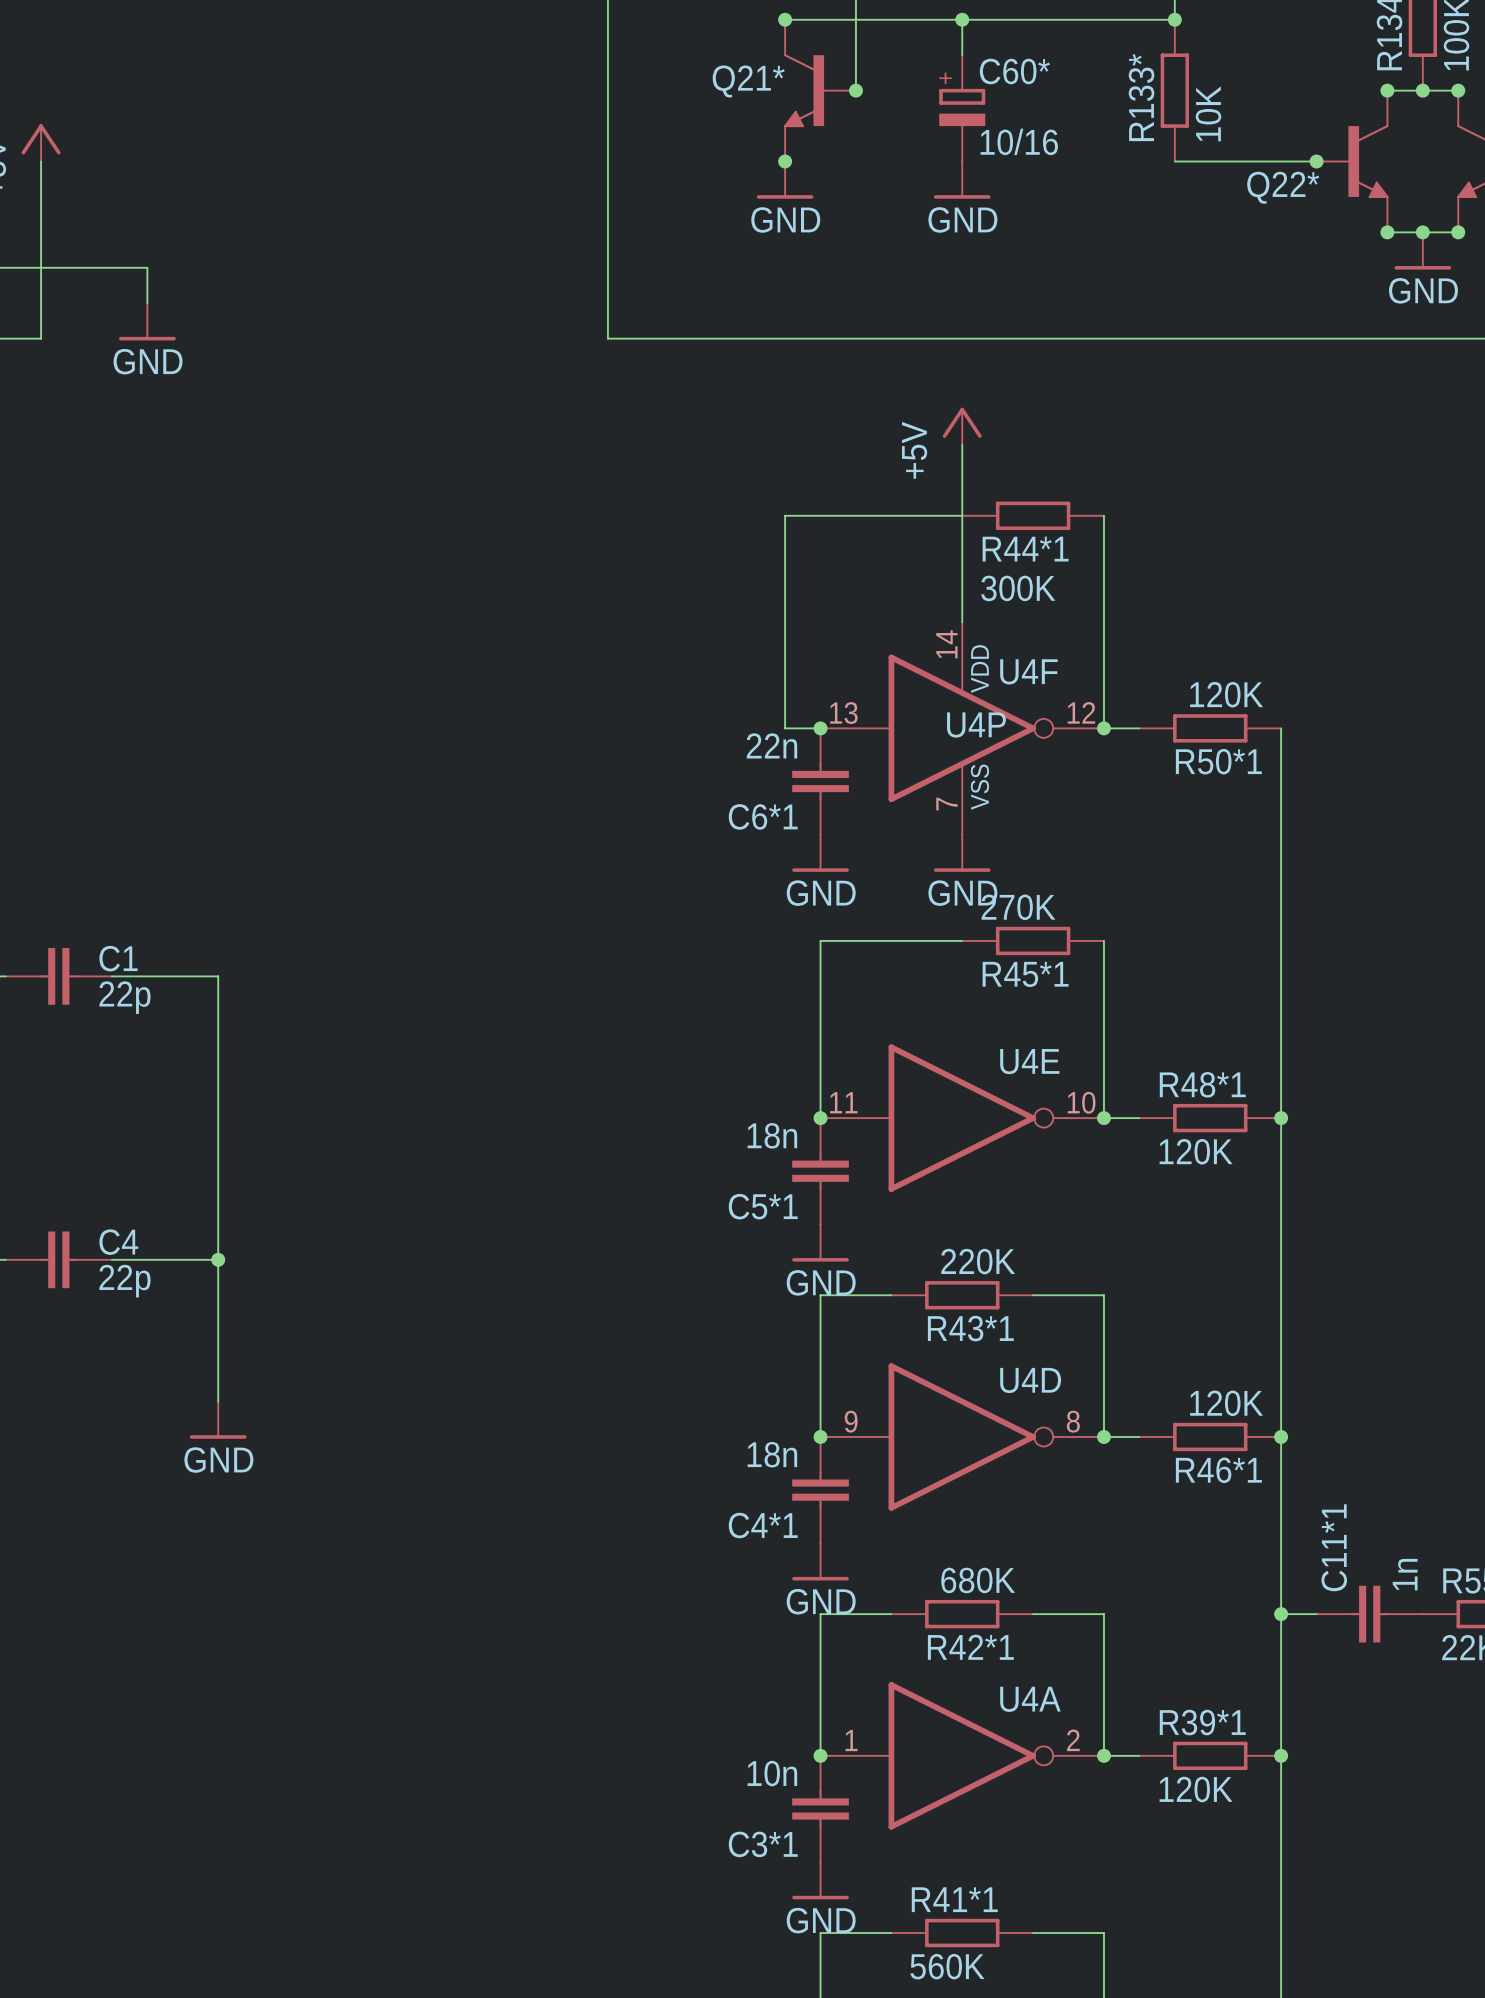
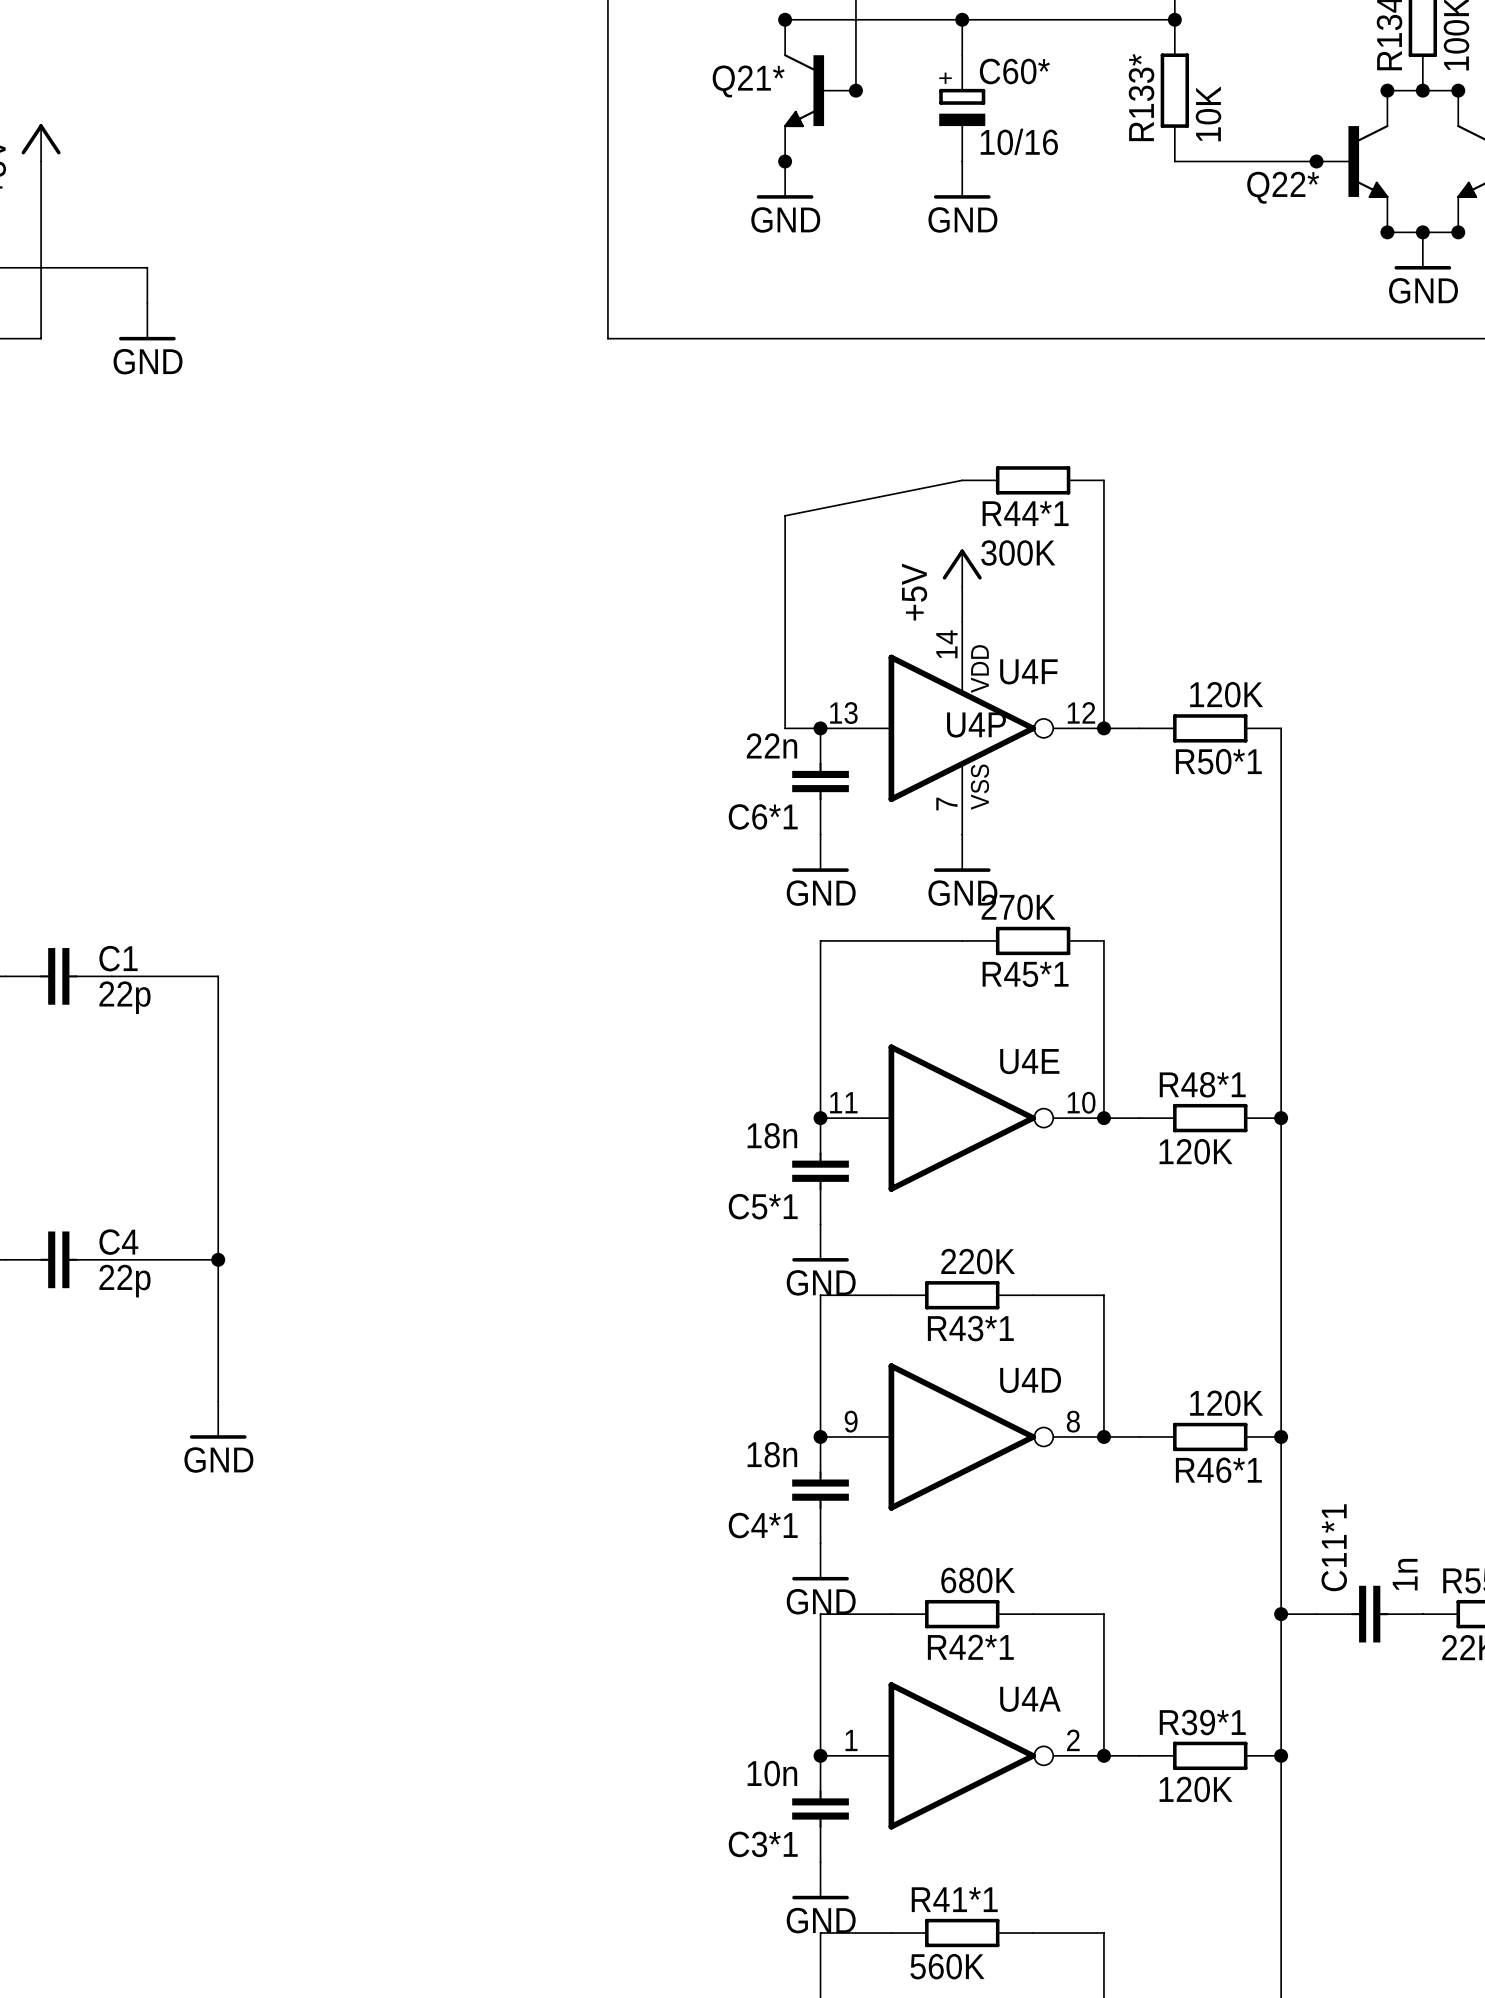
power symbol position: +5V (962, 426) -> +5V (962, 568)
wire: (962, 444) (962, 586) -> none
wire: none -> (1103, 480) (1103, 515)
wire: (785, 515) (962, 515) -> (785, 515) (962, 480)
R44*1 position: (1033, 515) -> (1033, 480)

